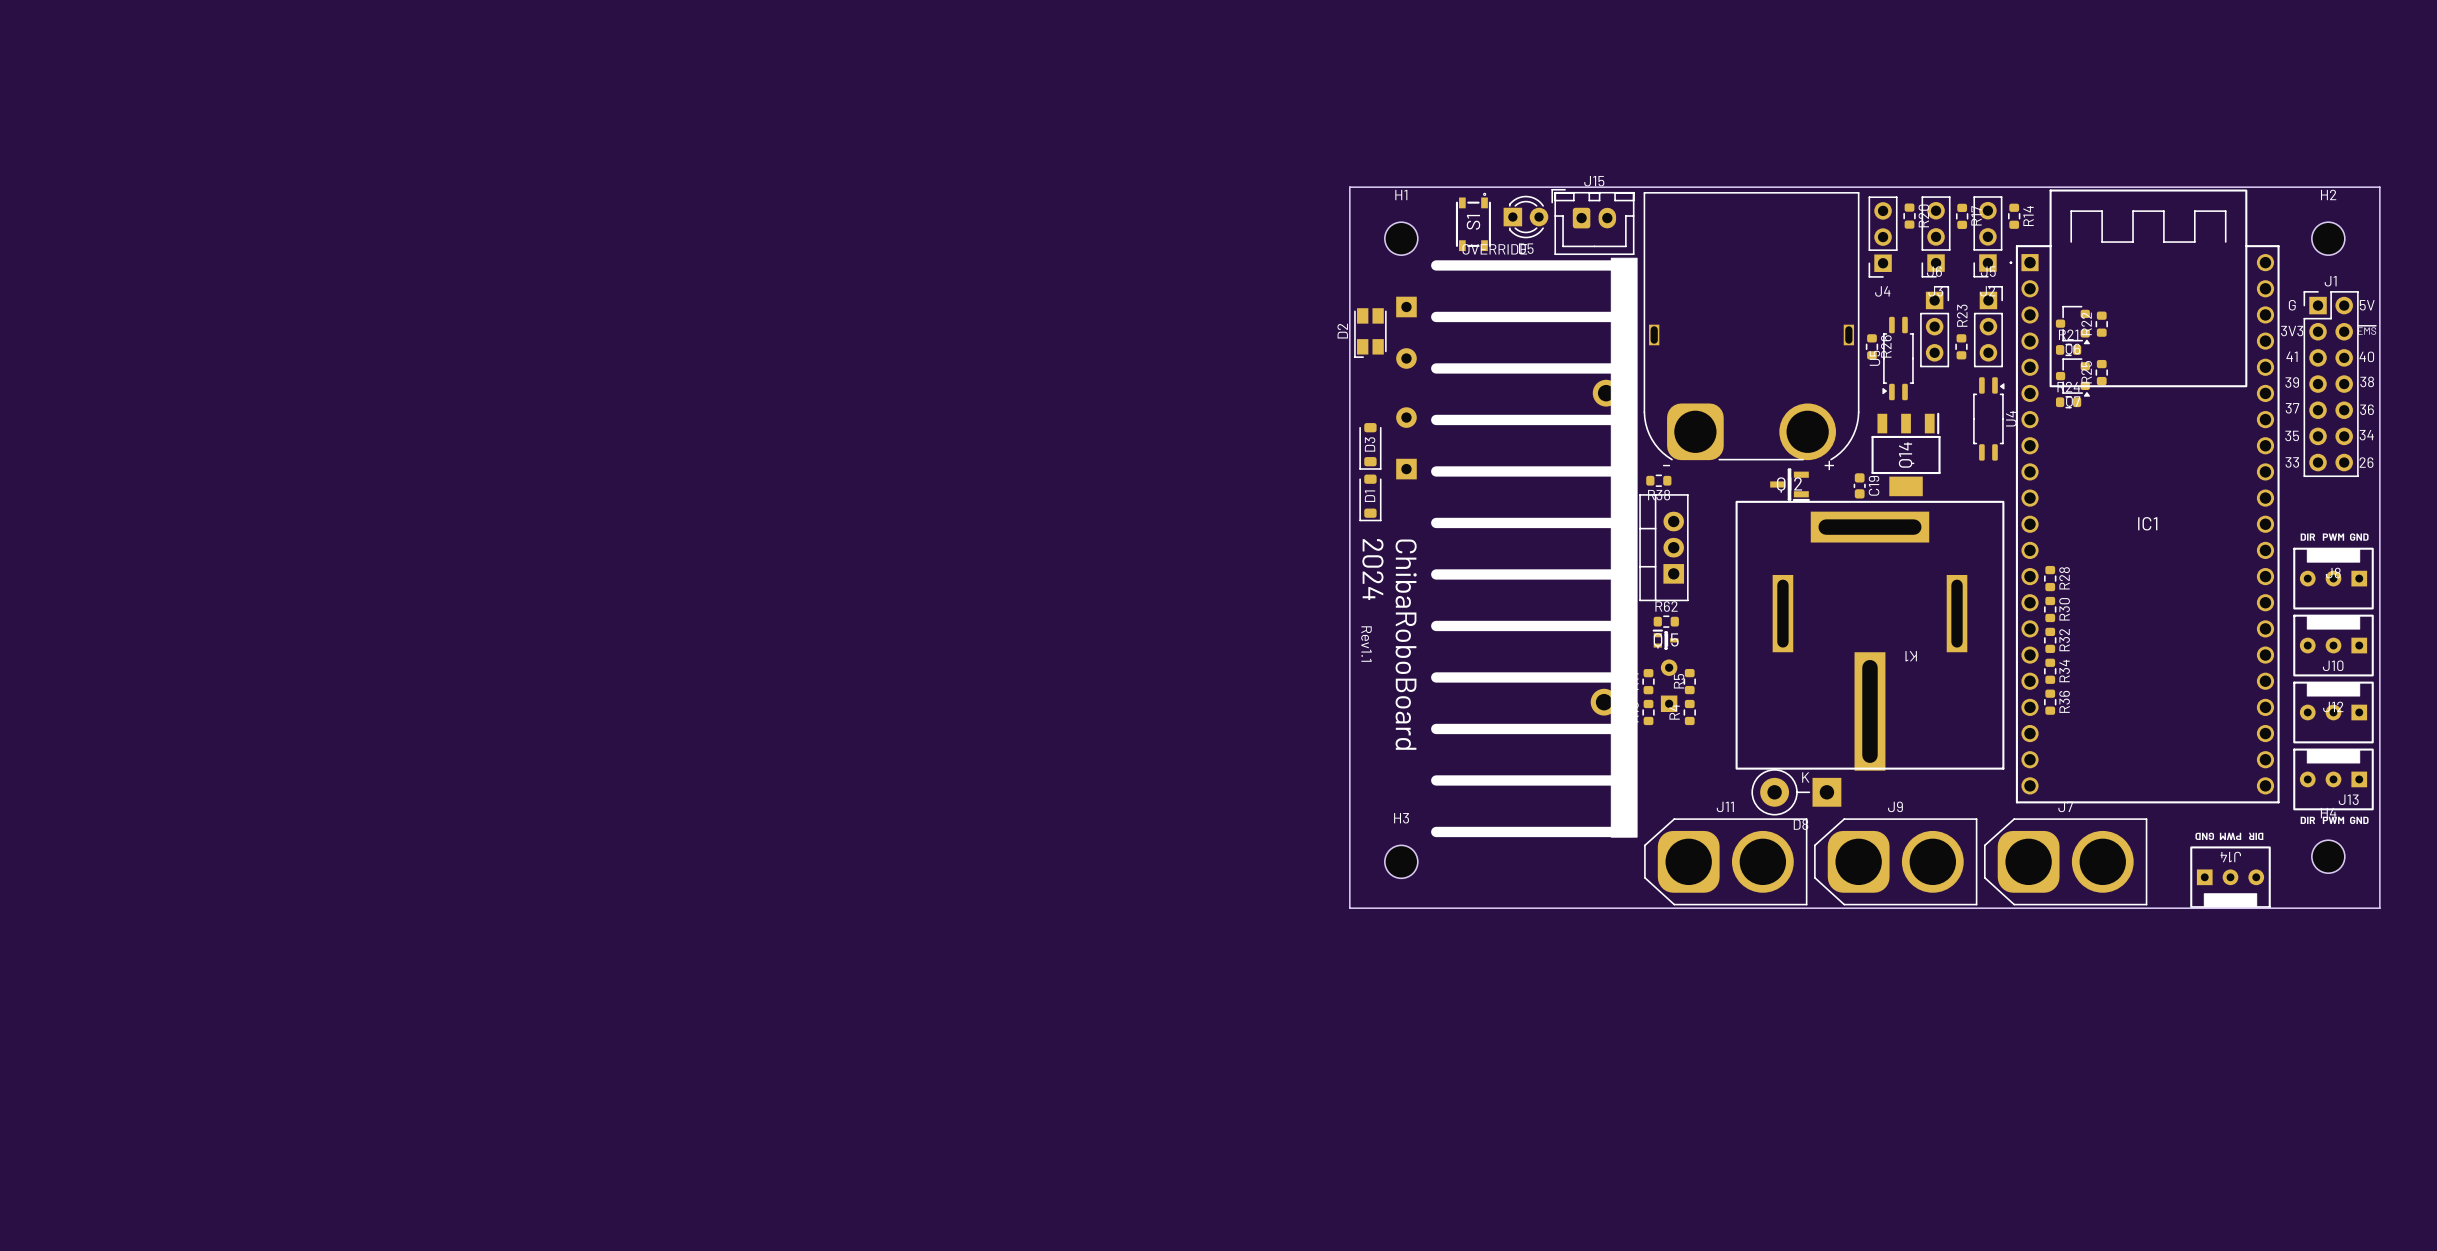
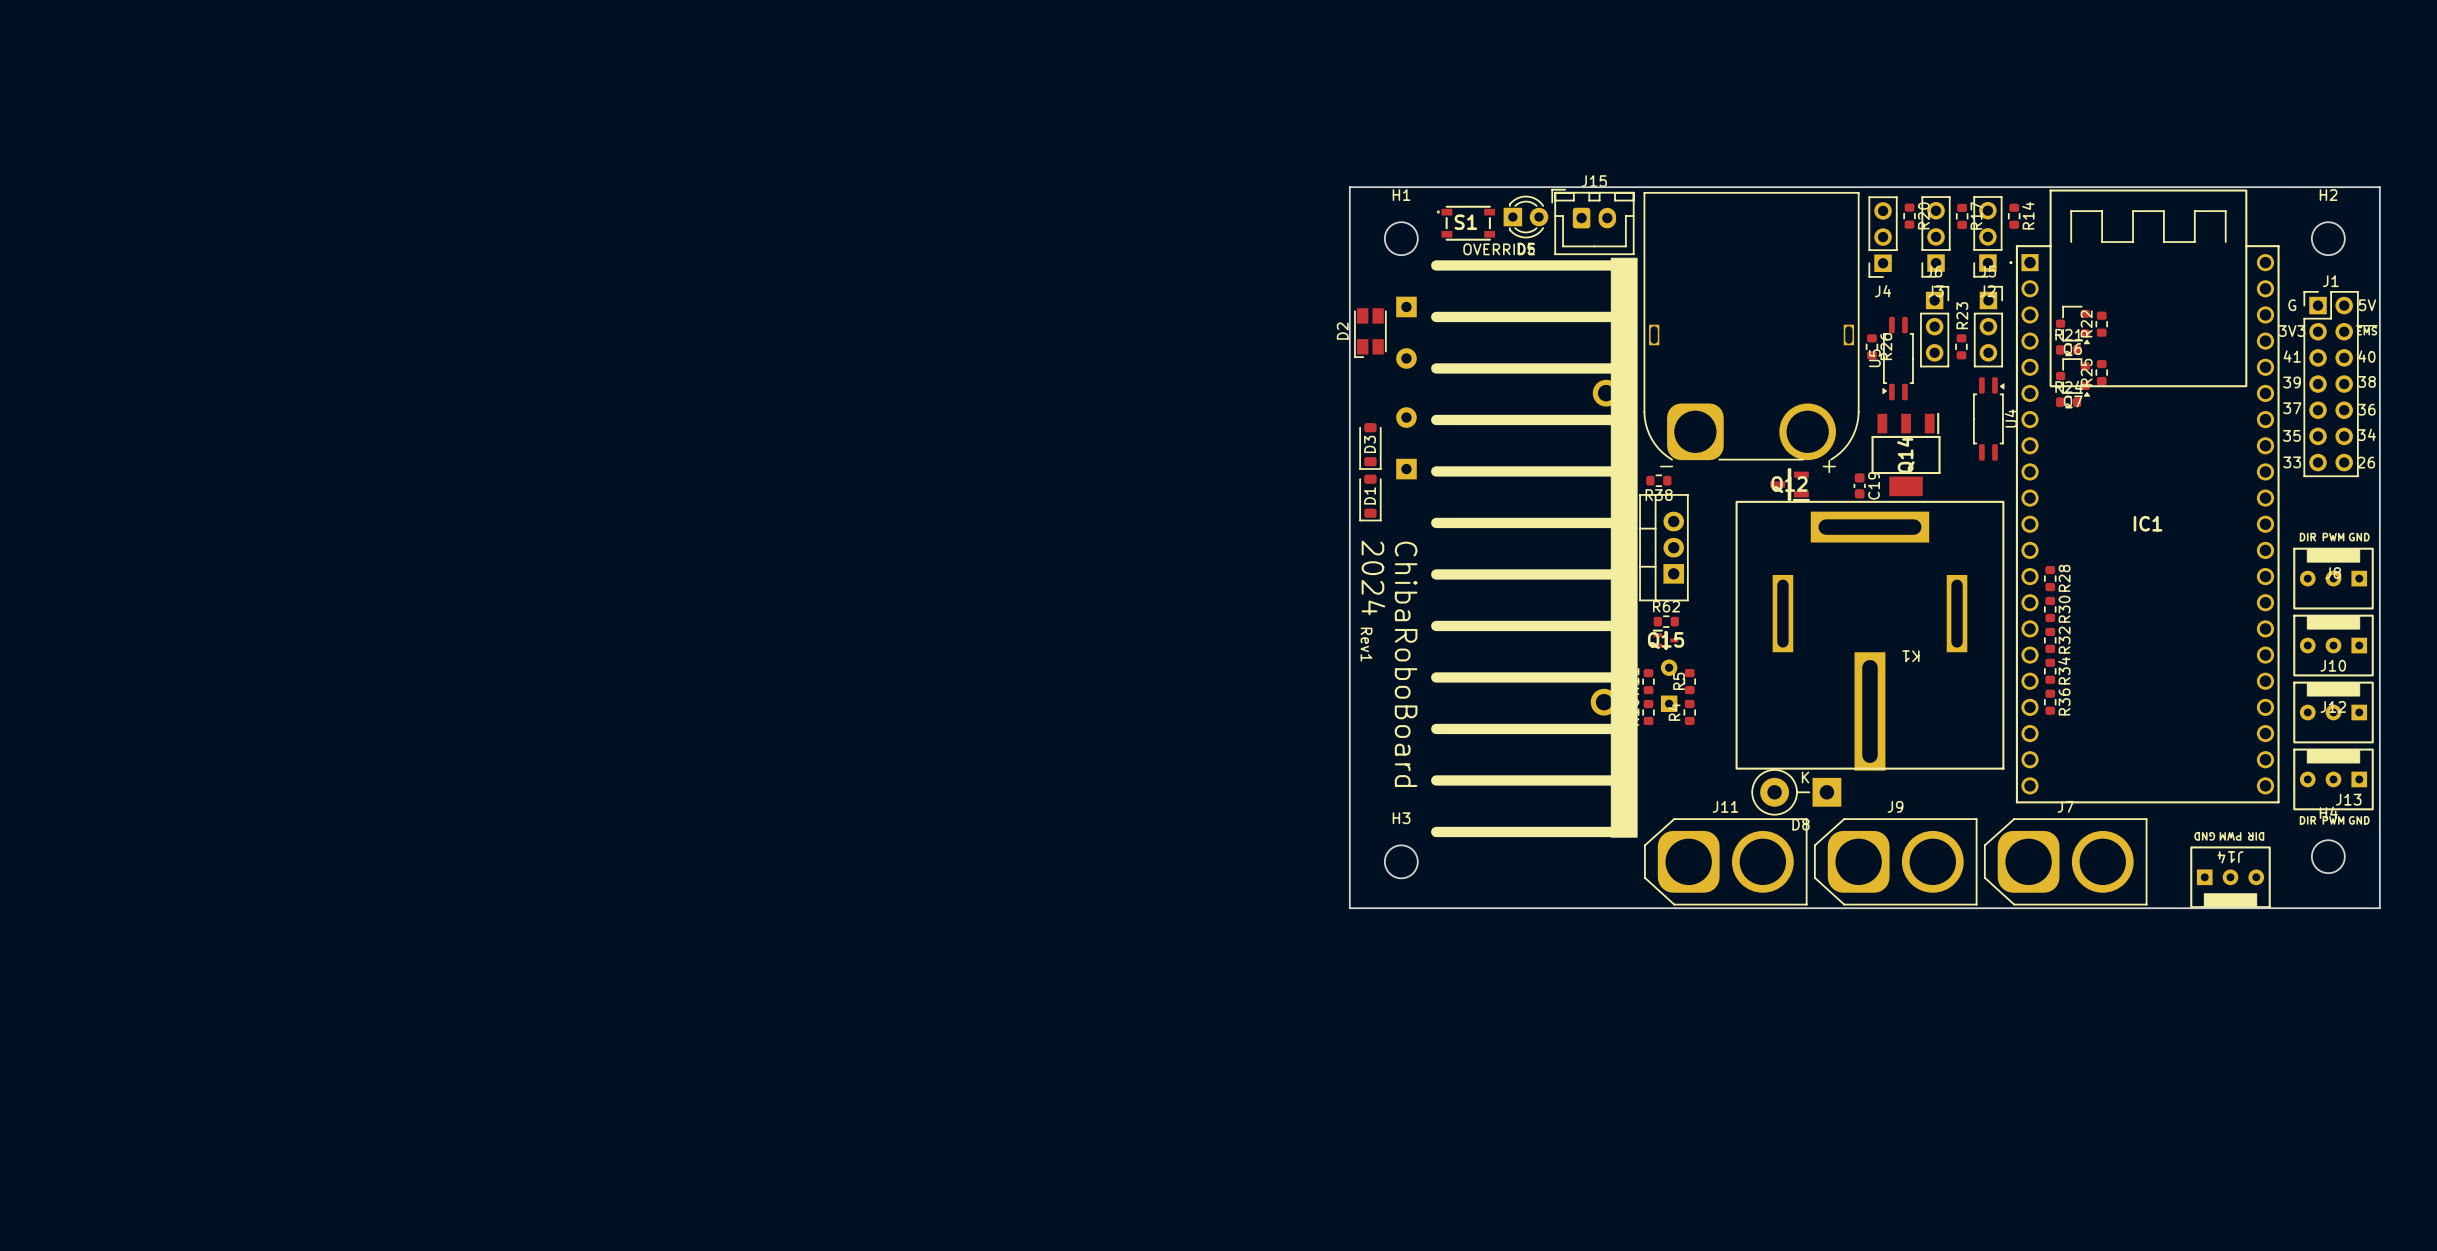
S1 rotation: 0° (1473, 221) -> 90° counterclockwise (1465, 223)
text: Rev1.1 (1366, 644) -> Rev1 (1366, 644)

